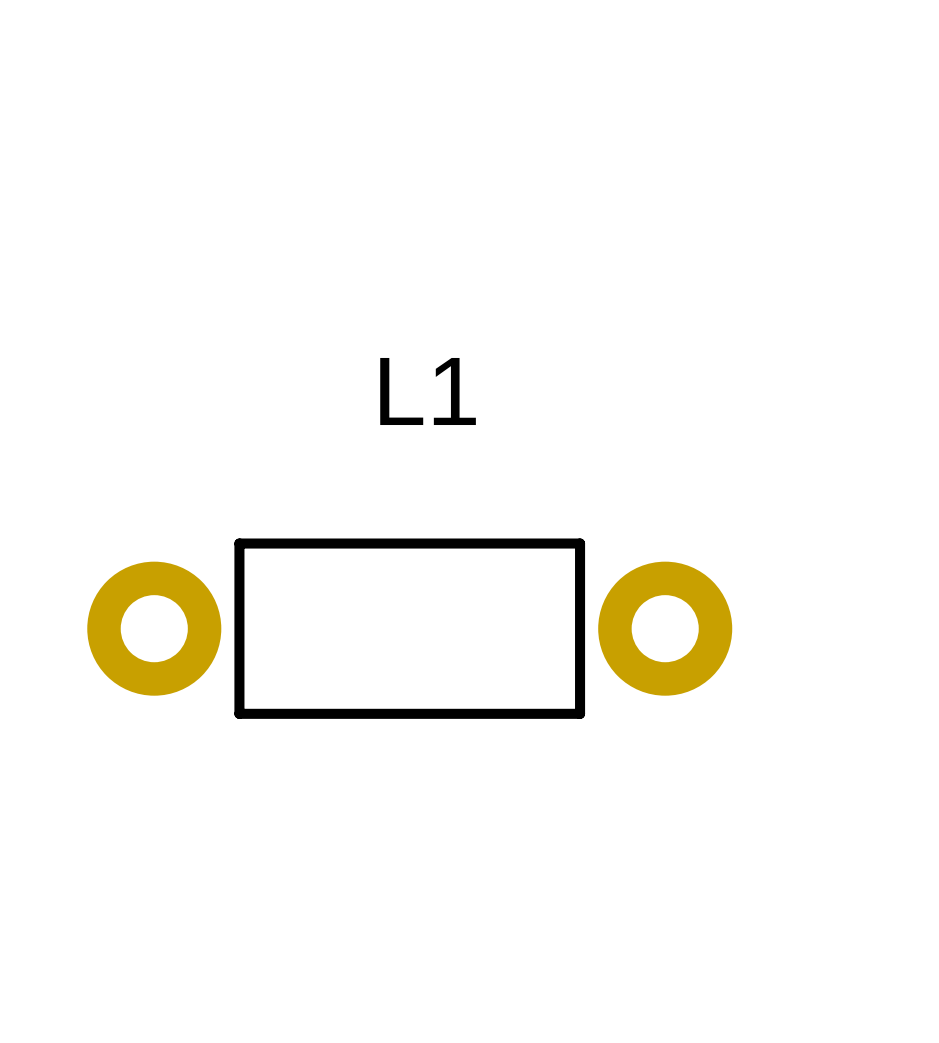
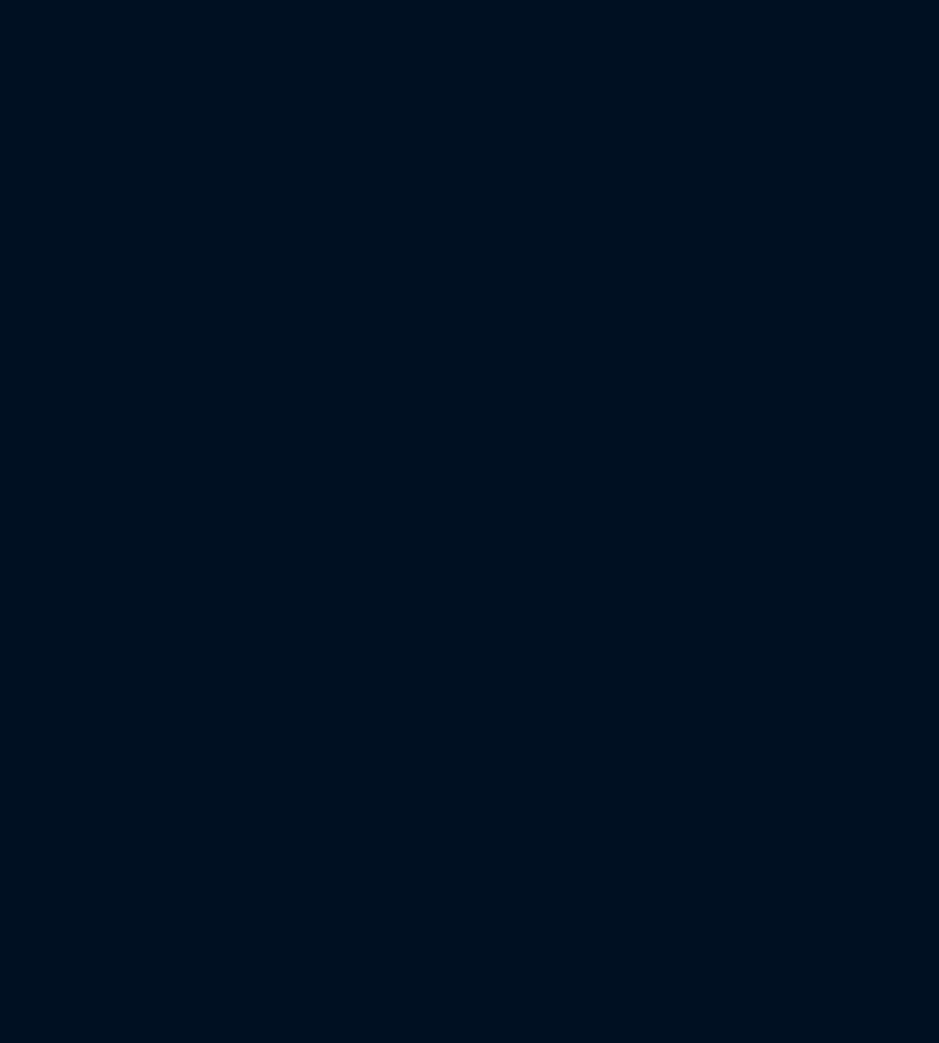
L1: (409, 628) -> none

